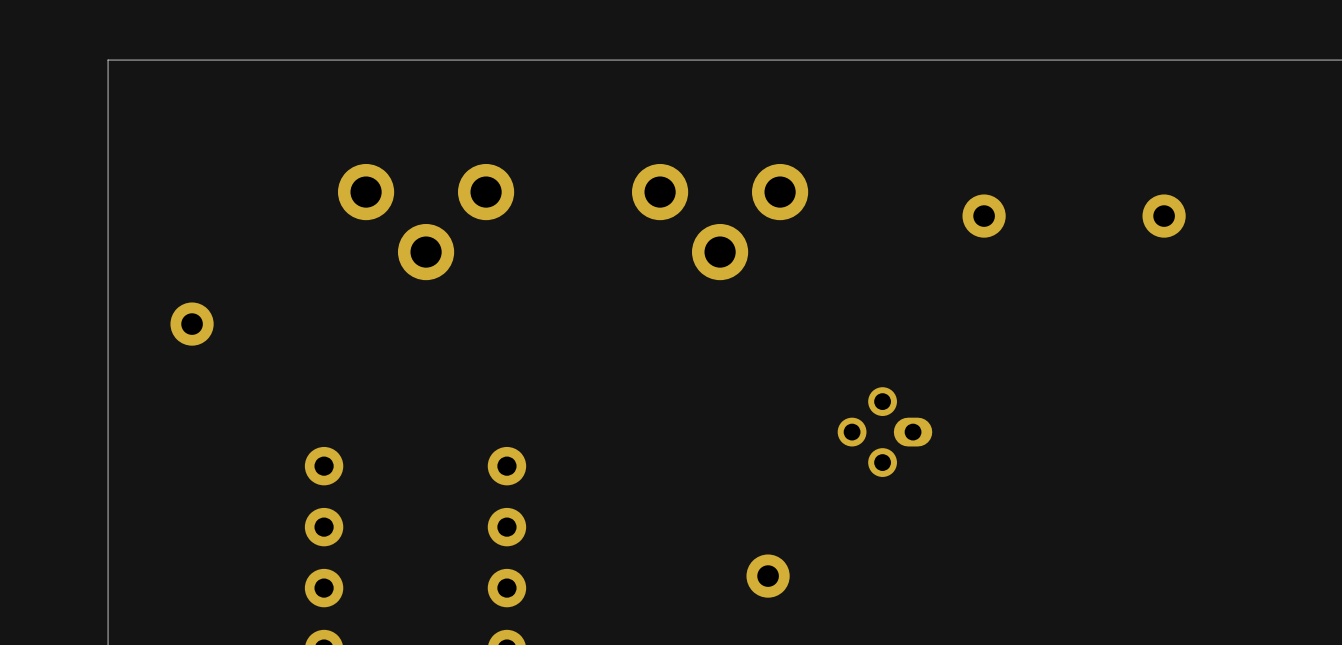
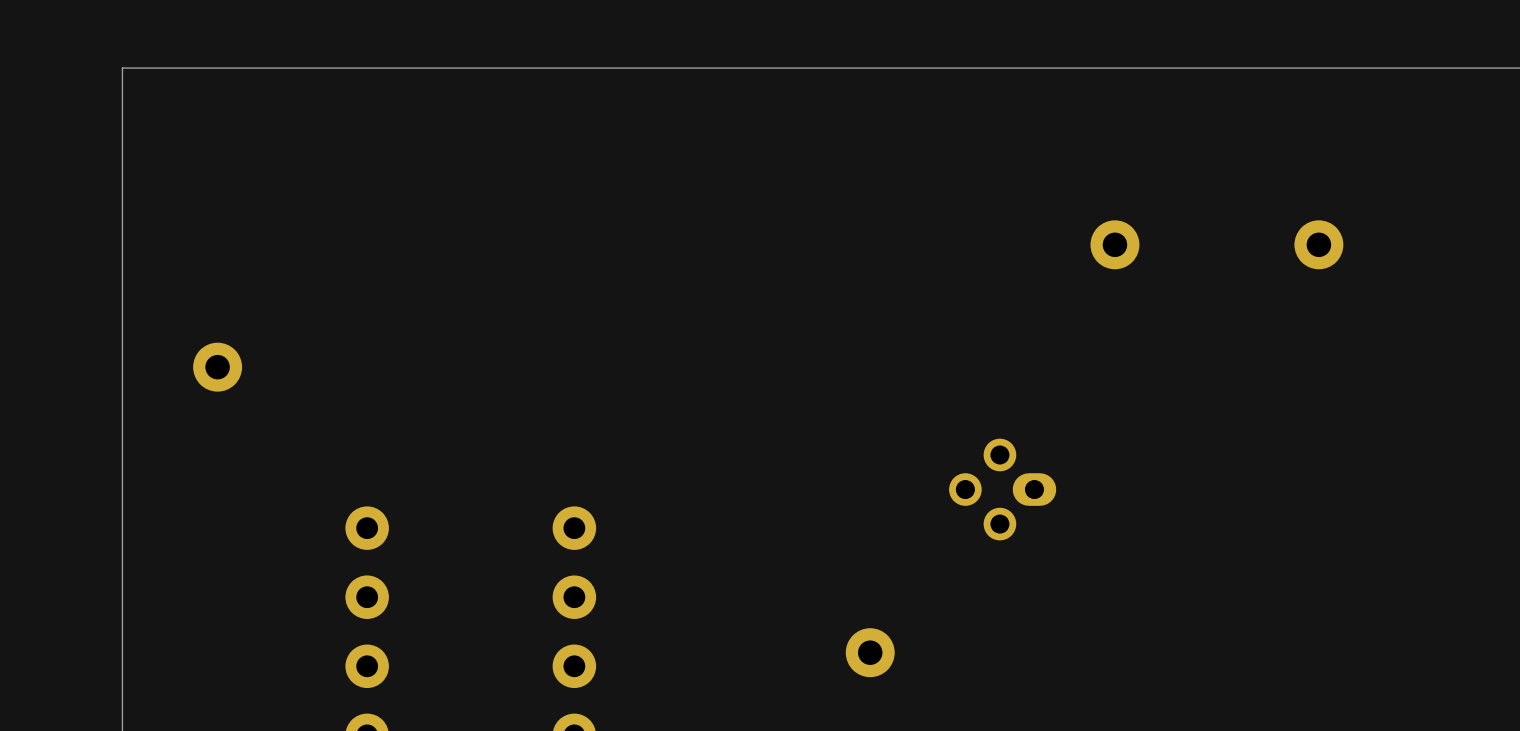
part: (426, 222) -> none
part: (720, 222) -> none

